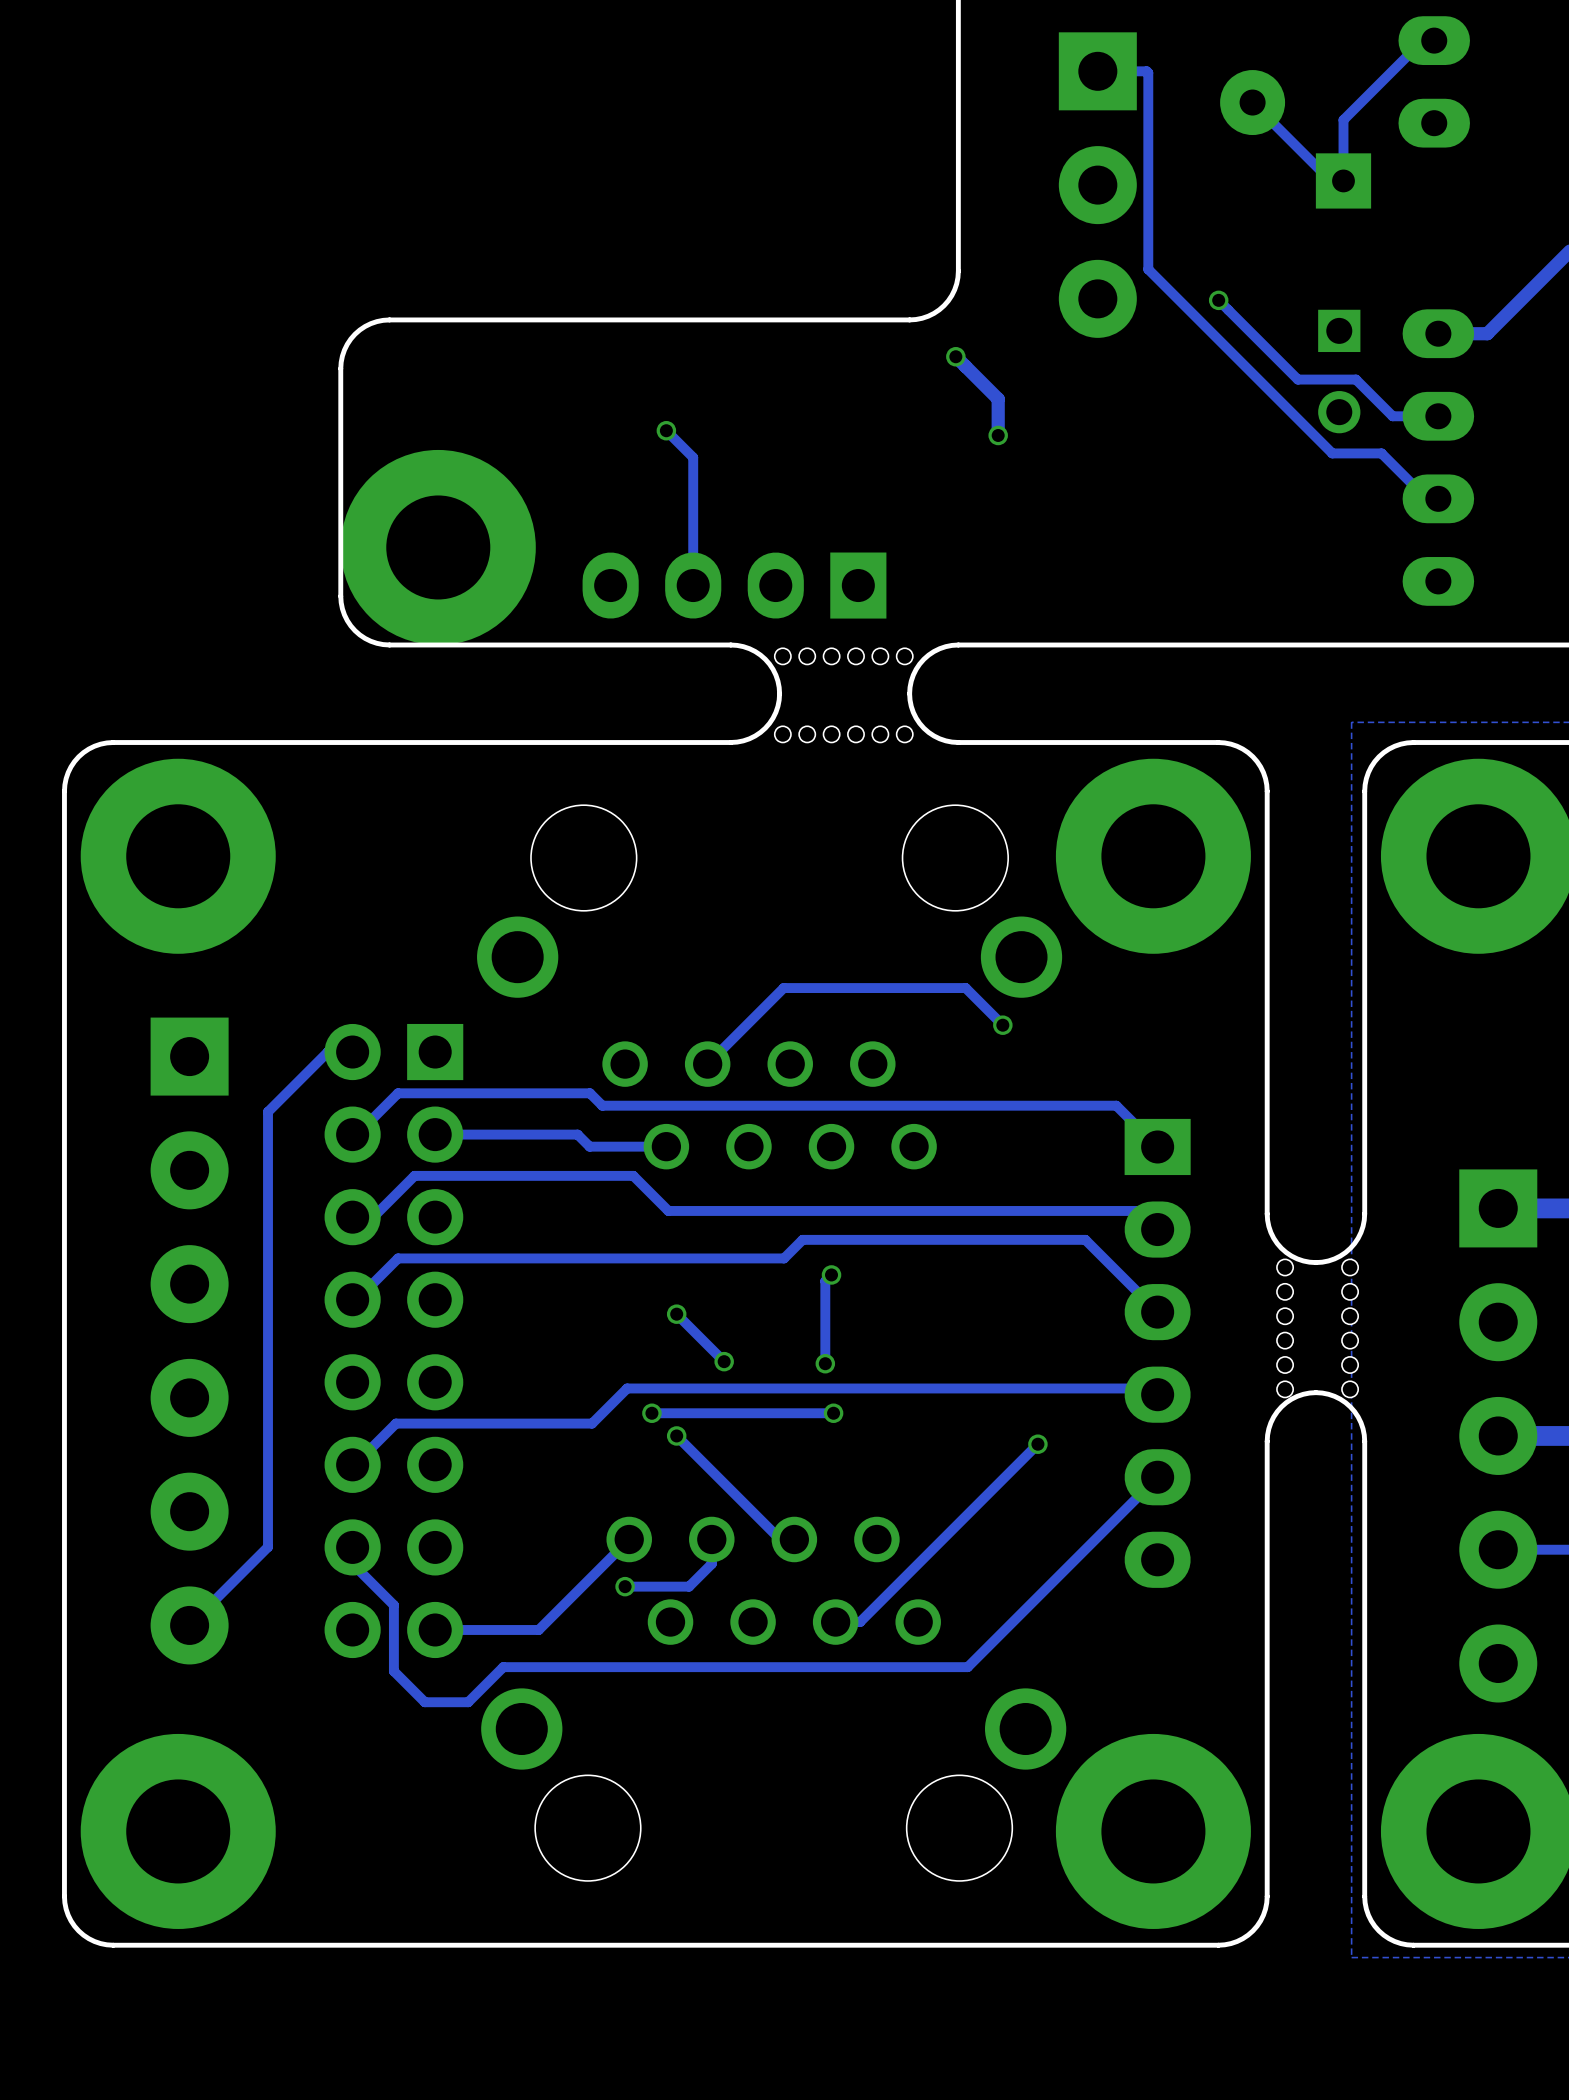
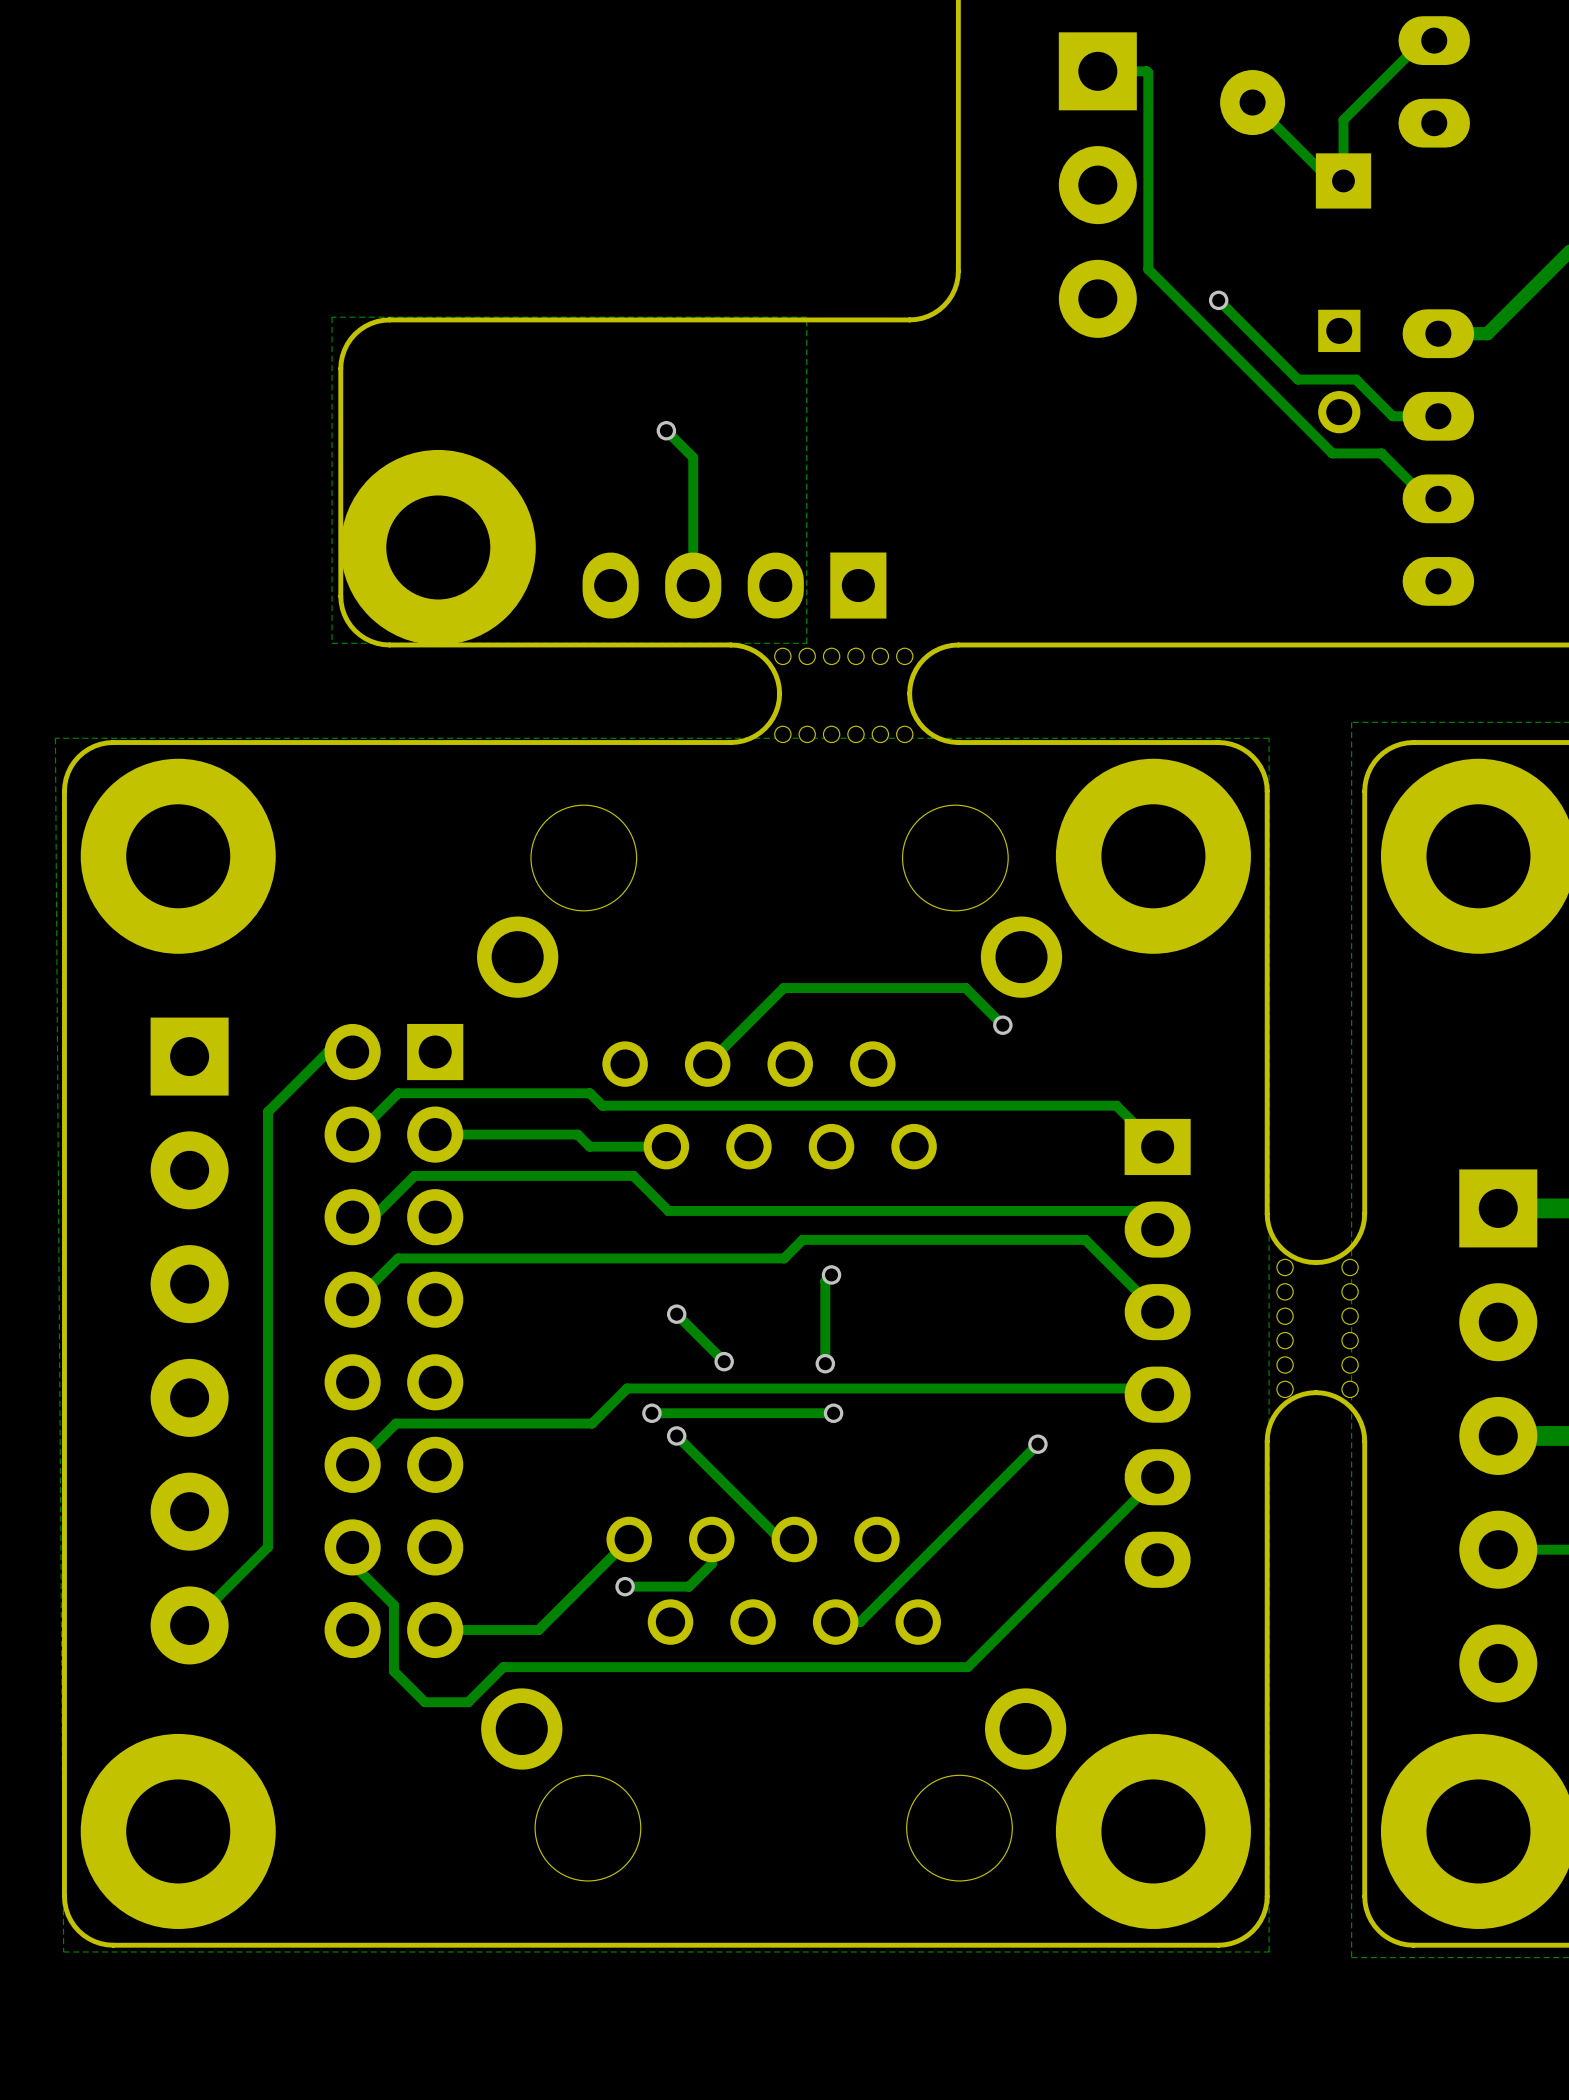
zone outline: none -> (806, 317) (806, 643) (331, 643) (331, 317) (806, 317)
track: (955, 356) (998, 399) (998, 435) -> none
via: (955, 356) -> none
via: (998, 435) -> none
zone outline: none -> (1269, 738) (1269, 1951) (63, 1951) (55, 738) (1269, 738)

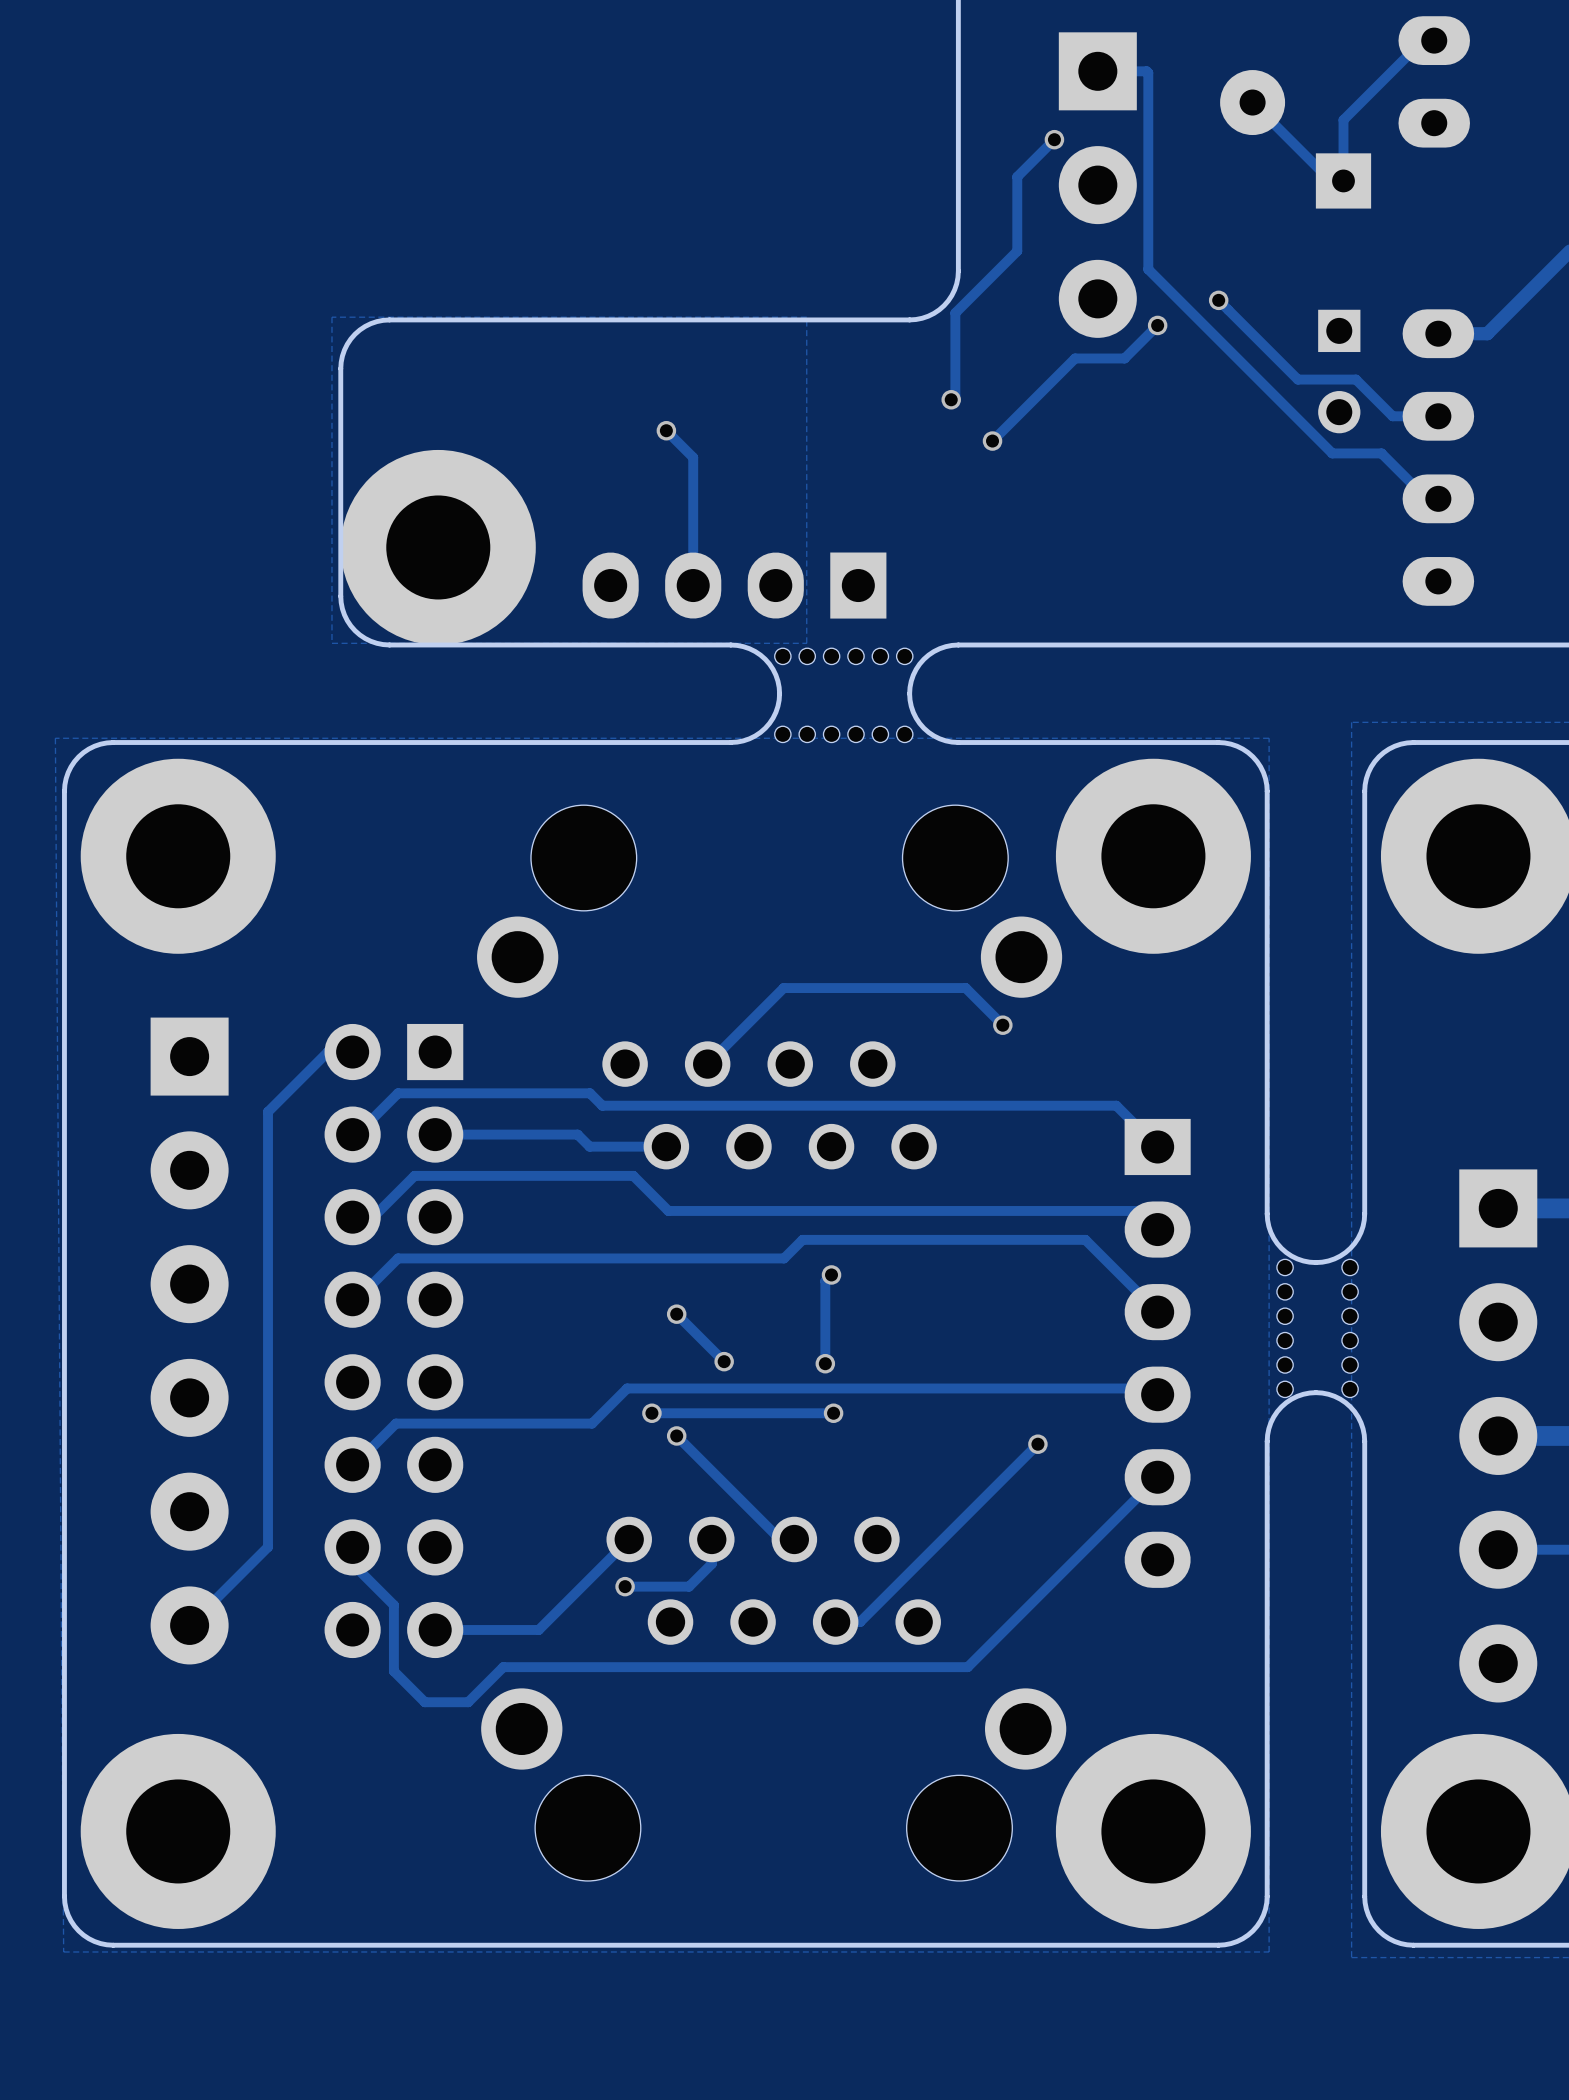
track: none -> (1054, 139) (1017, 176) (1017, 251) (955, 313) (955, 395) (951, 399)
via: none -> (1054, 139)
track: none -> (1157, 325) (1124, 358) (1075, 358) (992, 441)
via: none -> (1157, 325)
via: none -> (951, 399)
via: none -> (992, 441)

